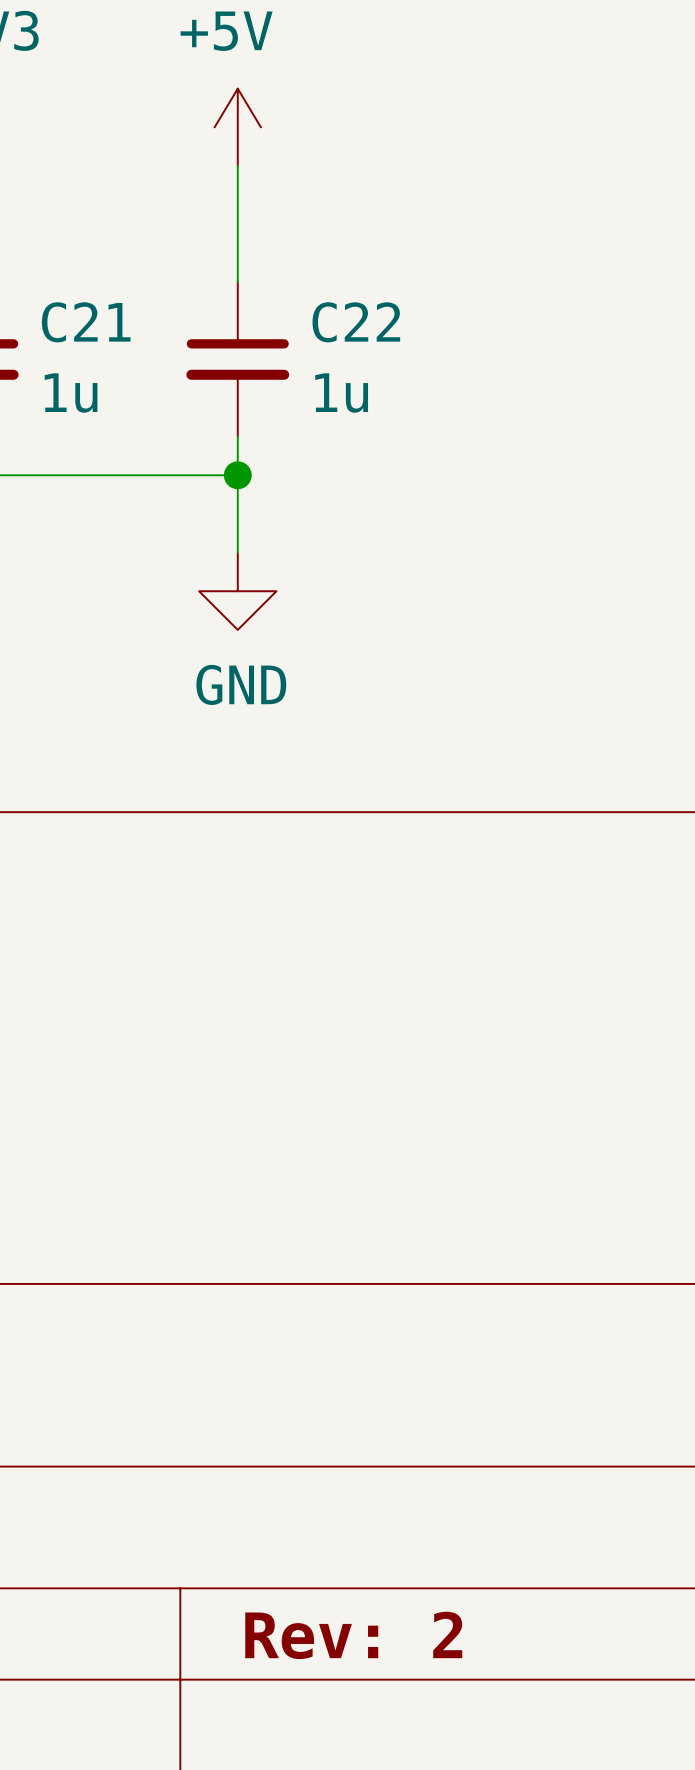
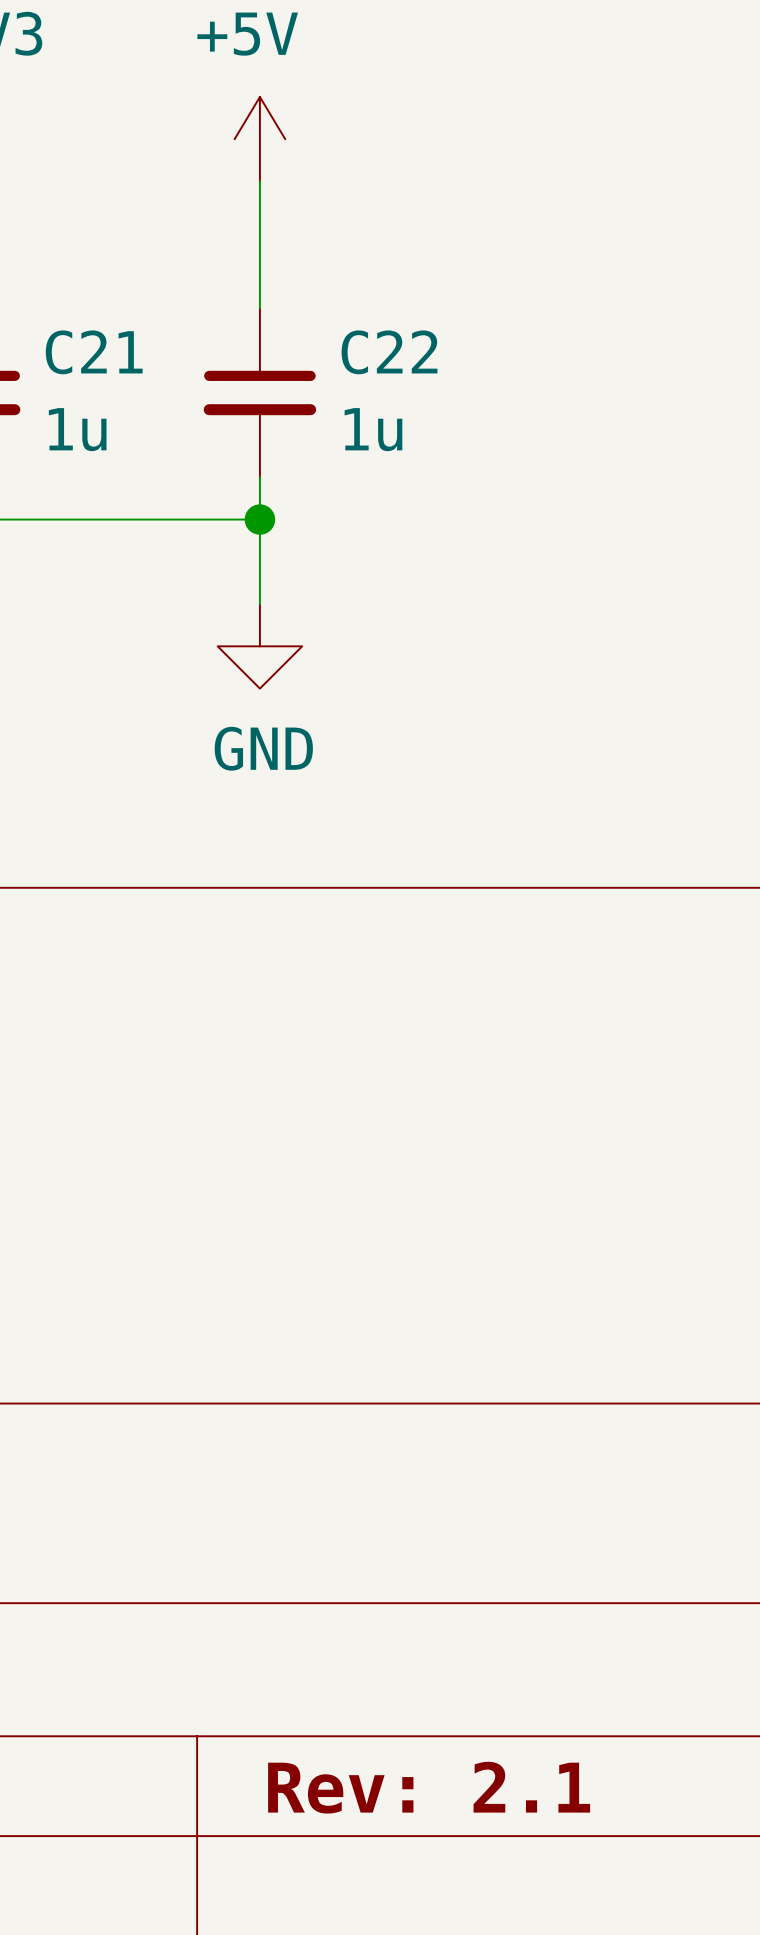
title block: Rev: 2 (353, 1635) -> Rev: 2.1 (429, 1787)

